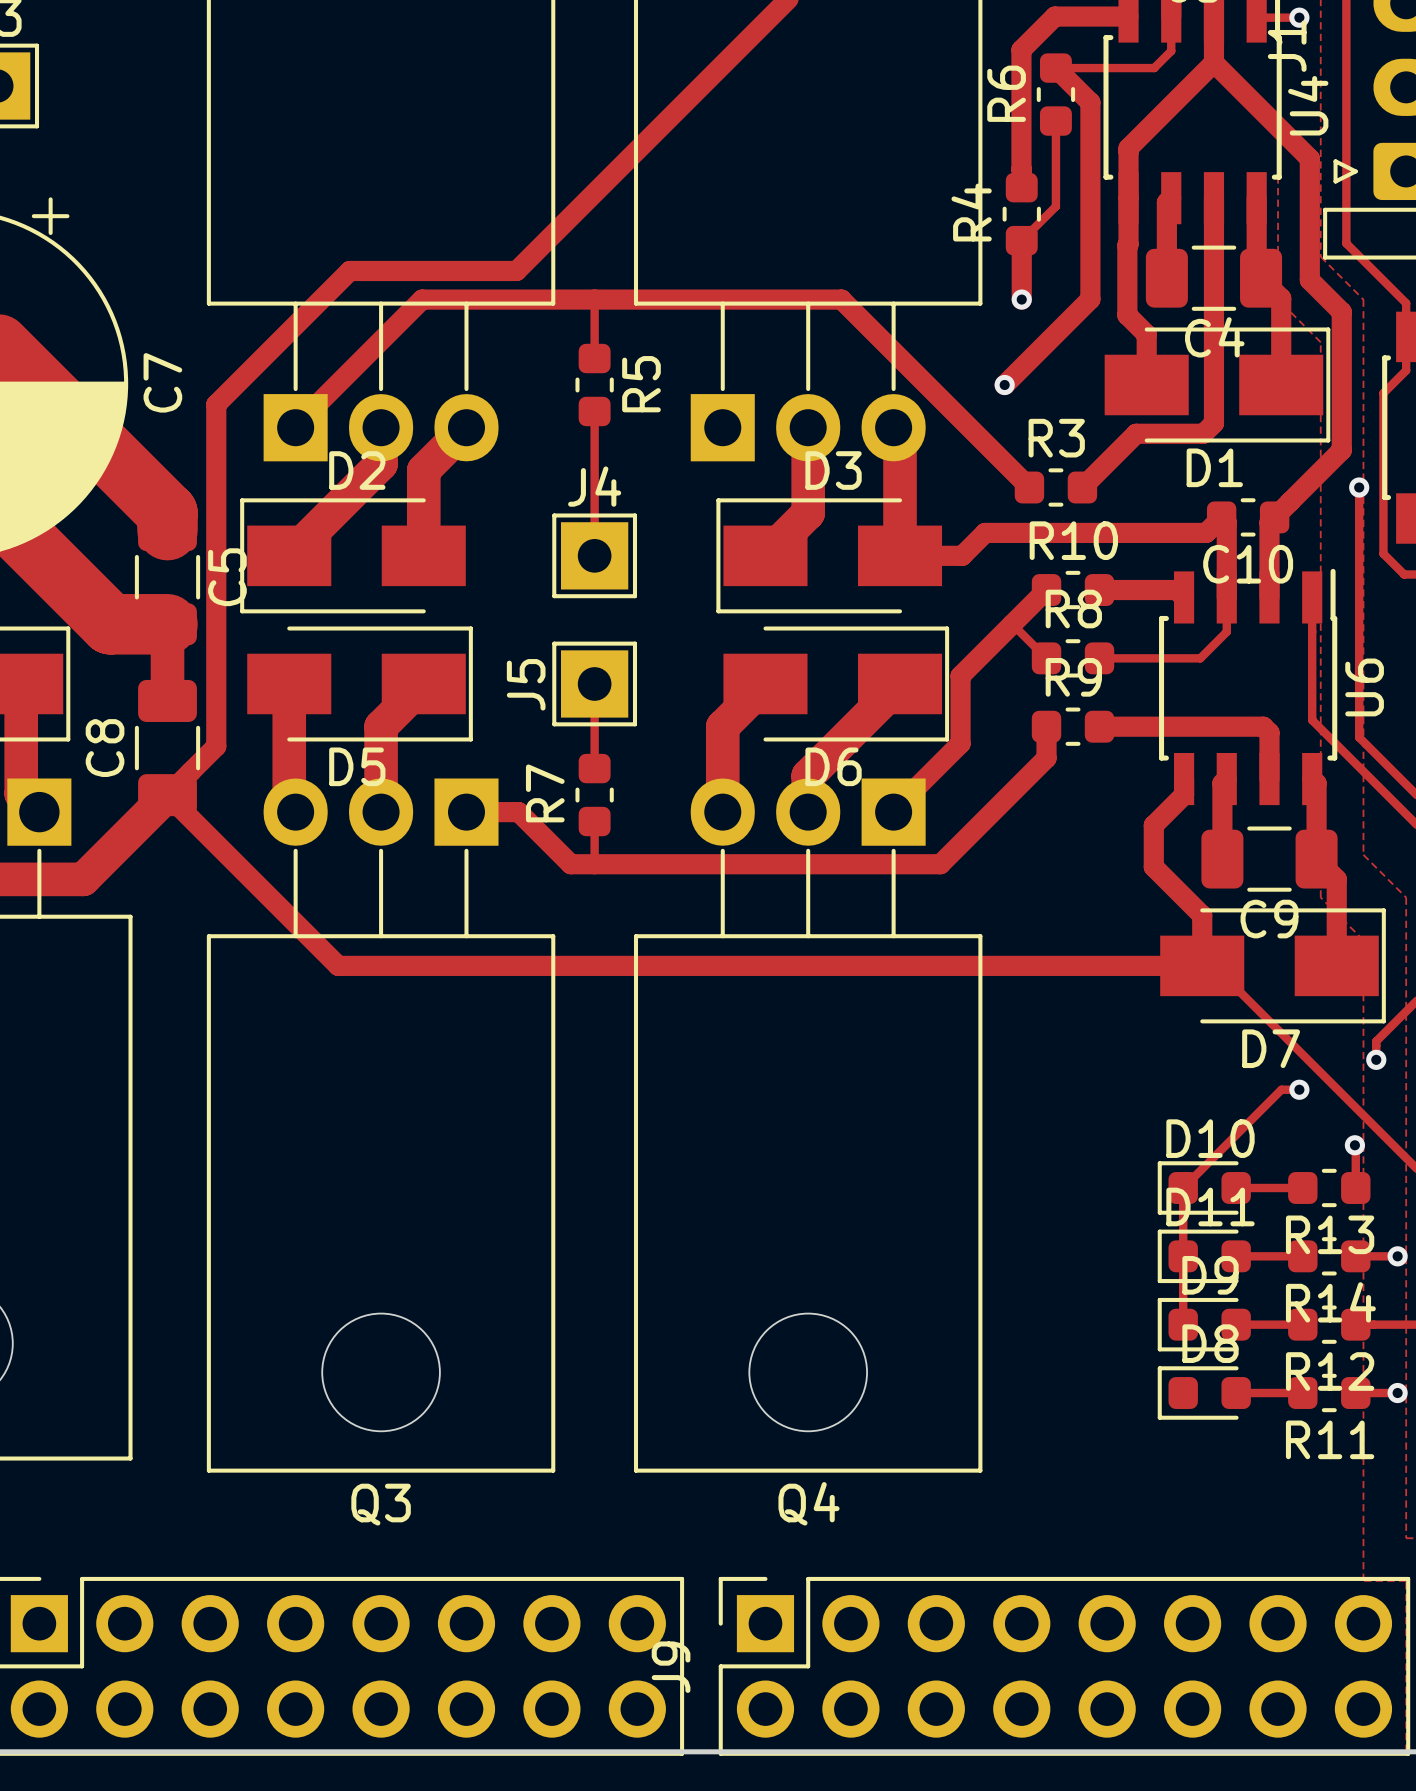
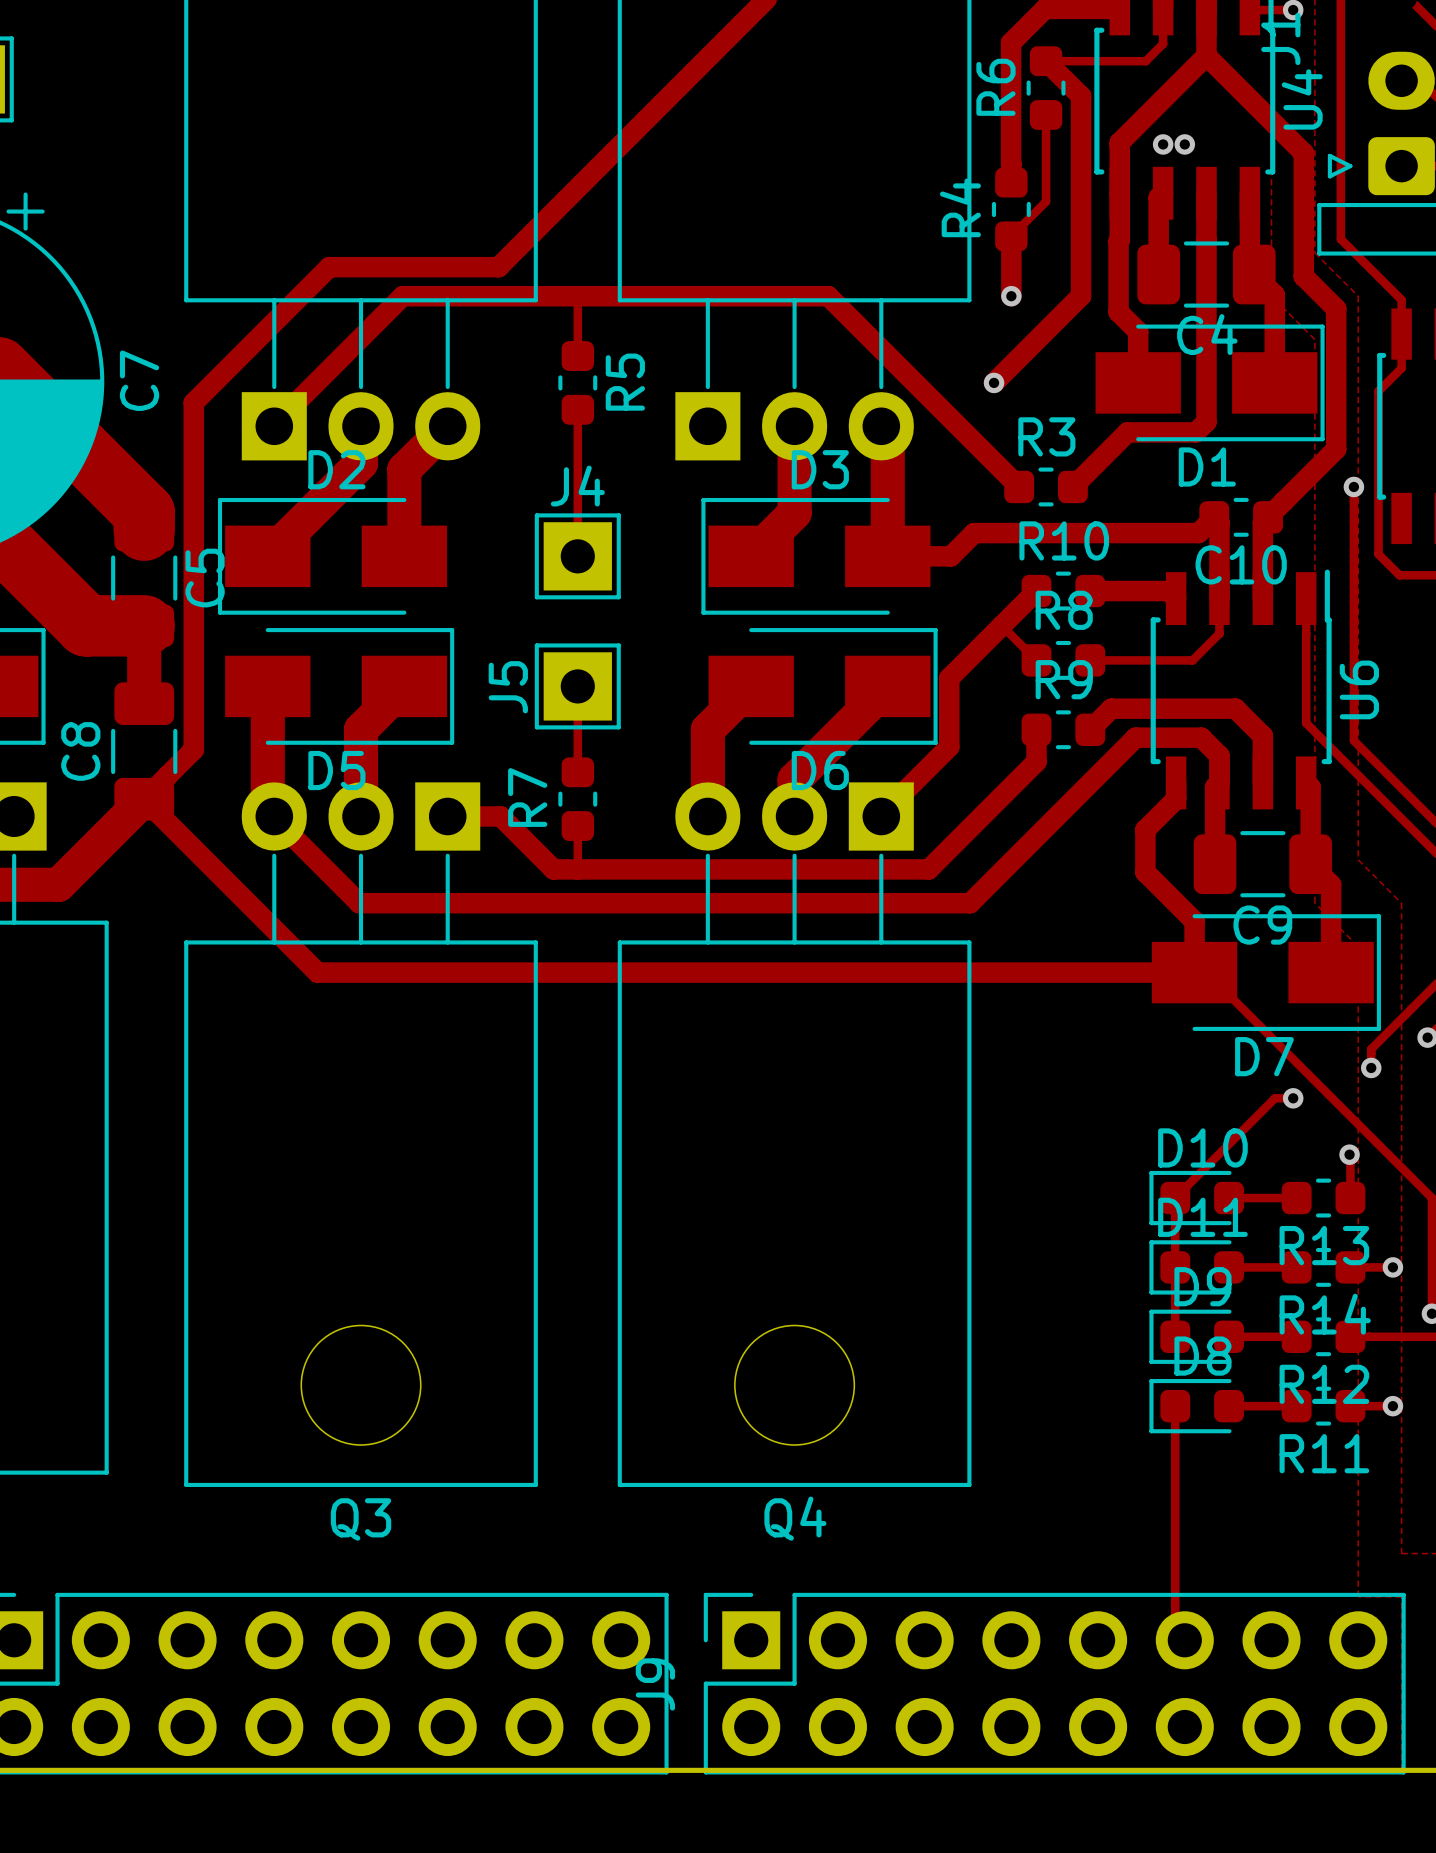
via: none -> (1163, 144)
via: none -> (1184, 144)
track: (1099, 726) (1263, 726) -> (1090, 729) (1111, 708) (1235, 708) (1256, 729)
track: none -> (1219, 782) (1219, 755) (1201, 737) (1135, 737) (970, 903) (359, 903) (274, 816)
track: none -> (1175, 1406) (1175, 1630) (1184, 1640)

